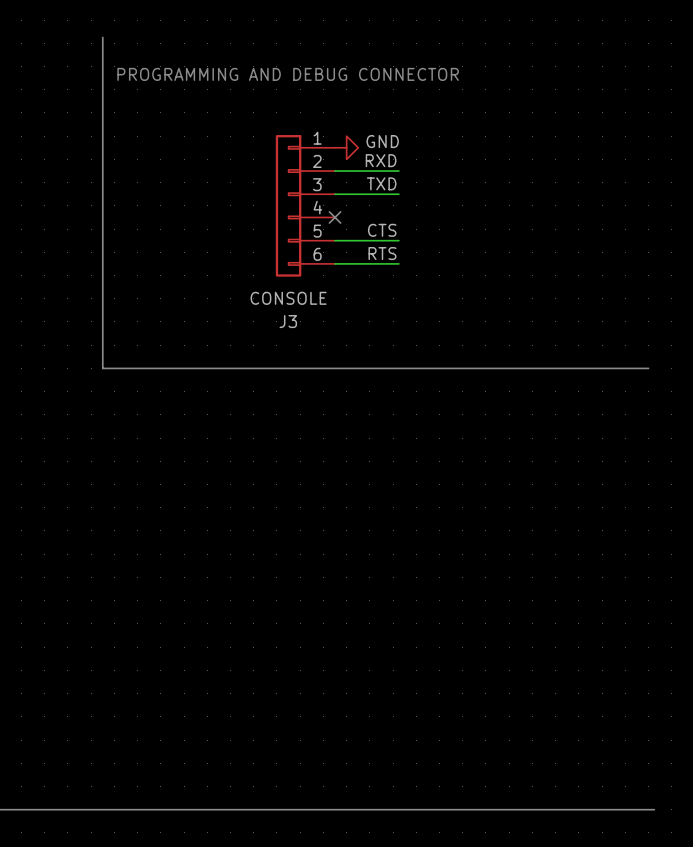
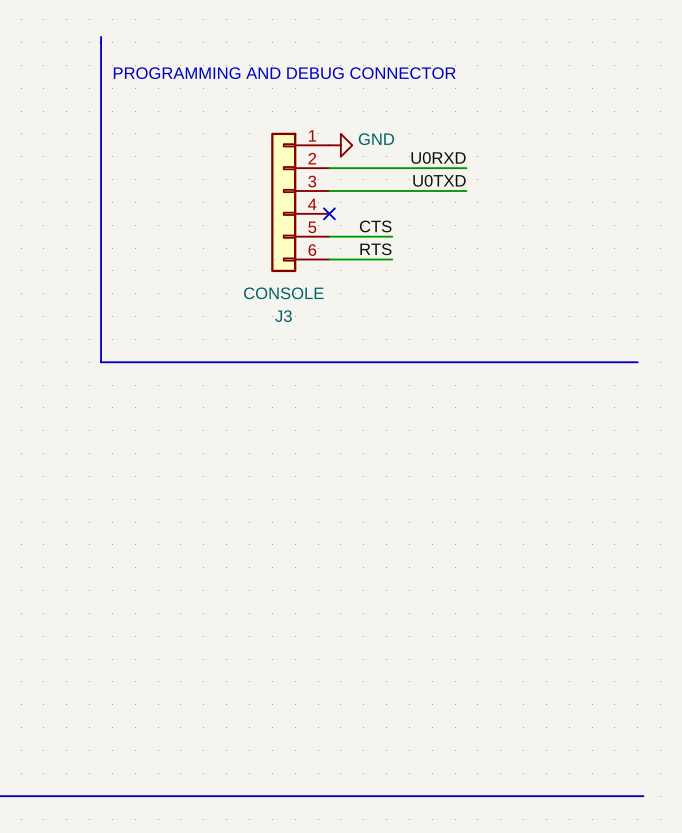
label: RXD (381, 160) -> none
label: none -> U0RXD (438, 157)
wire: none -> (392, 168) (466, 168)
label: TXD (381, 183) -> none
label: none -> U0TXD (439, 180)
wire: none -> (392, 190) (466, 190)

